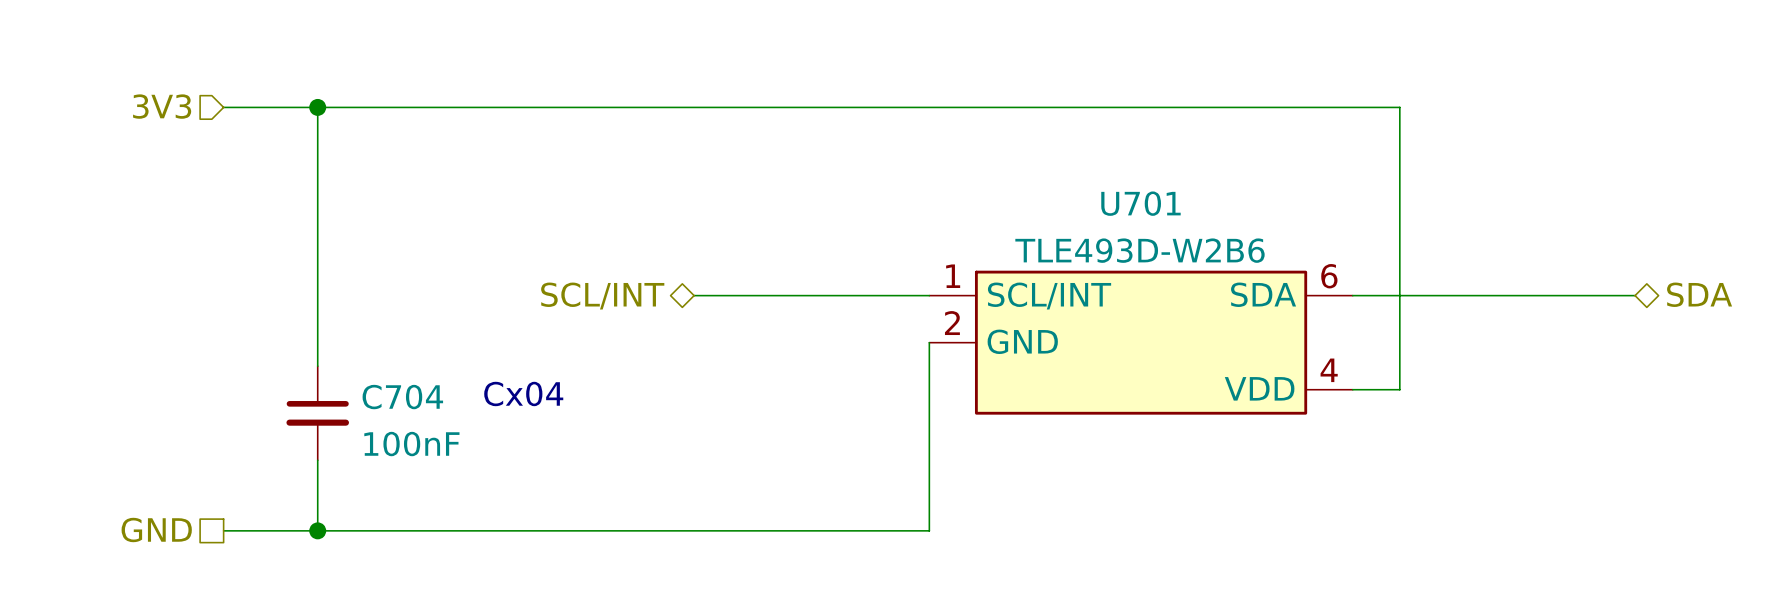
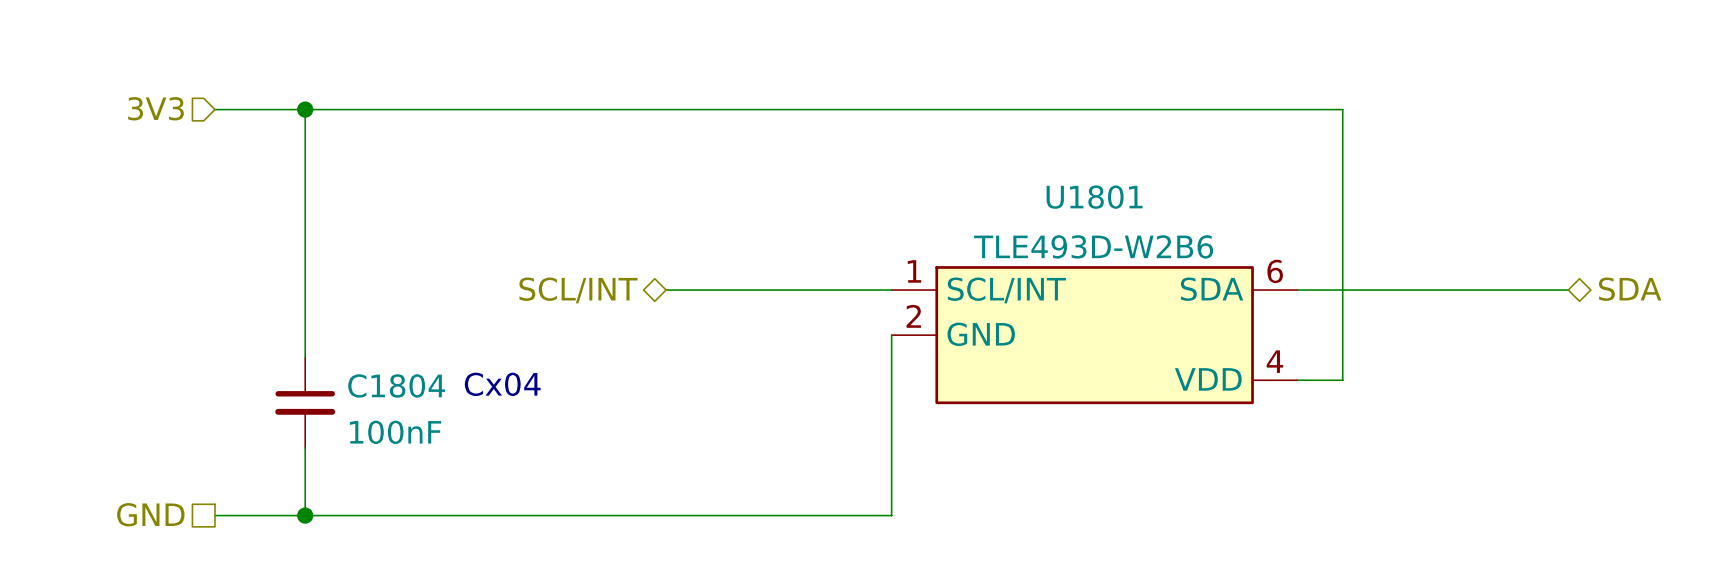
U701 name: U701 (1140, 203) -> U1801 (1094, 197)
C704 name: C704 (402, 397) -> C1804 (396, 385)

